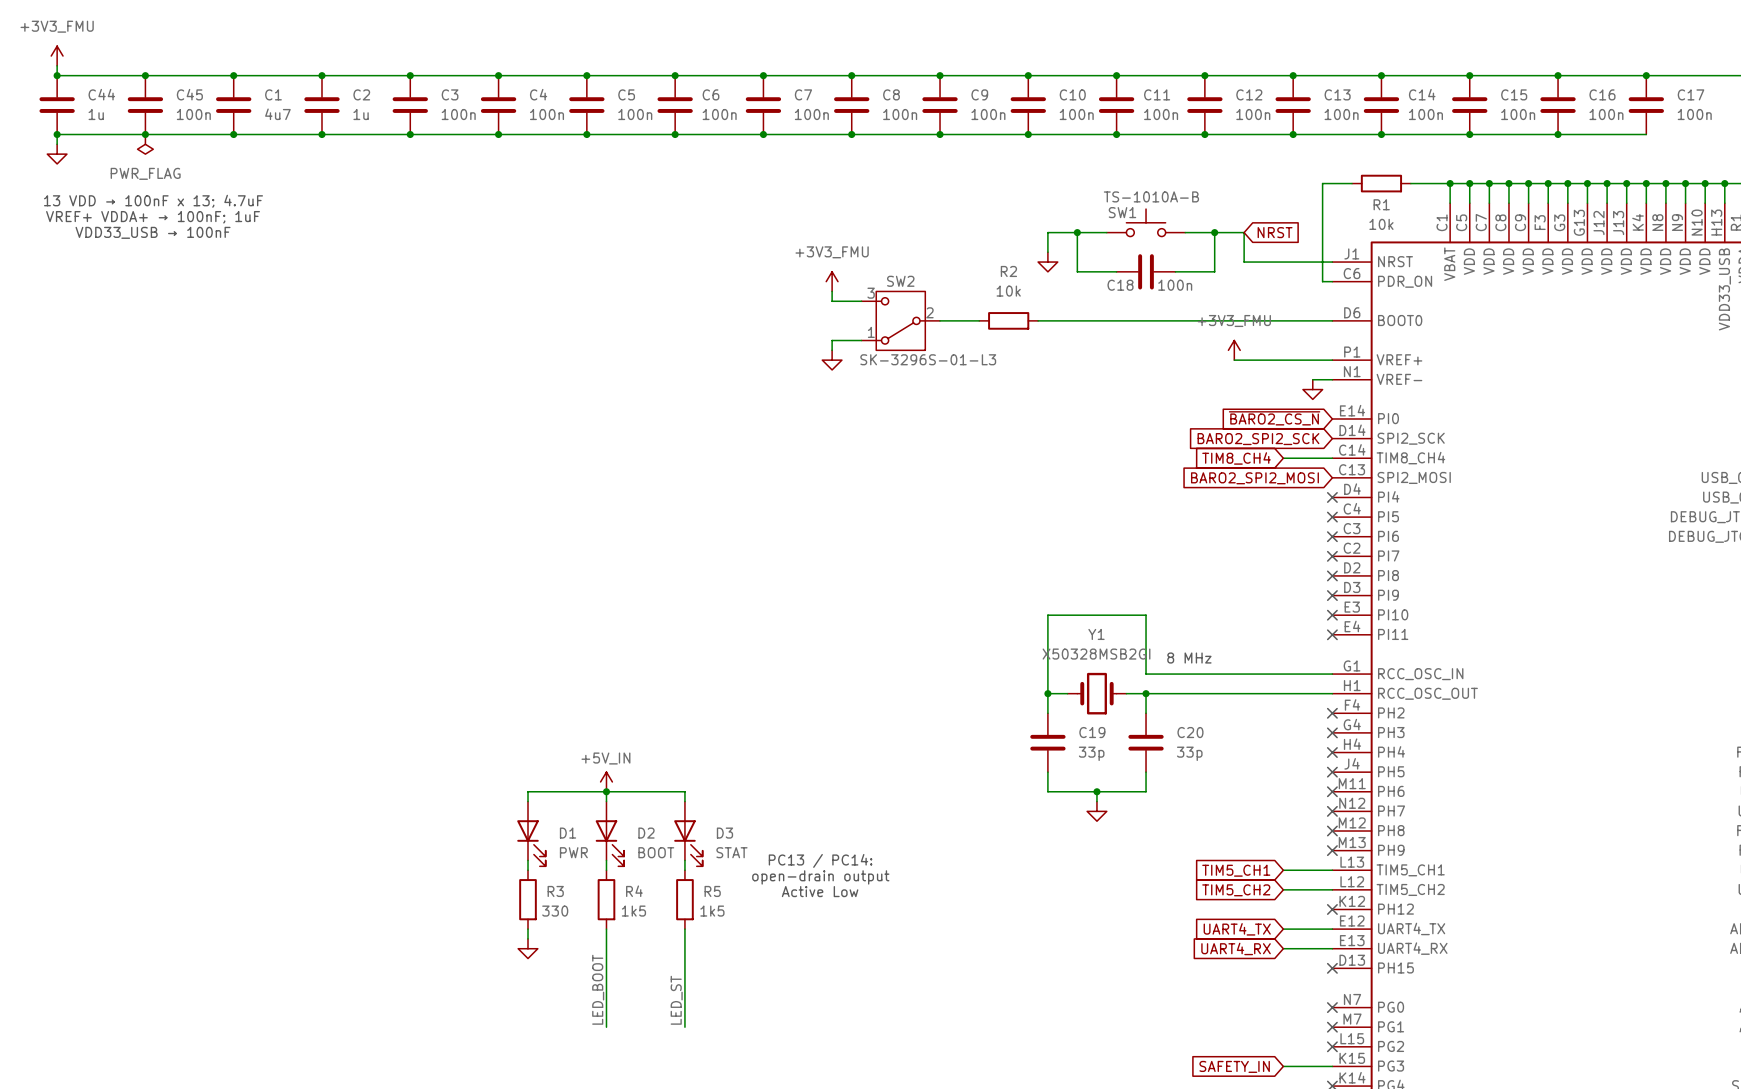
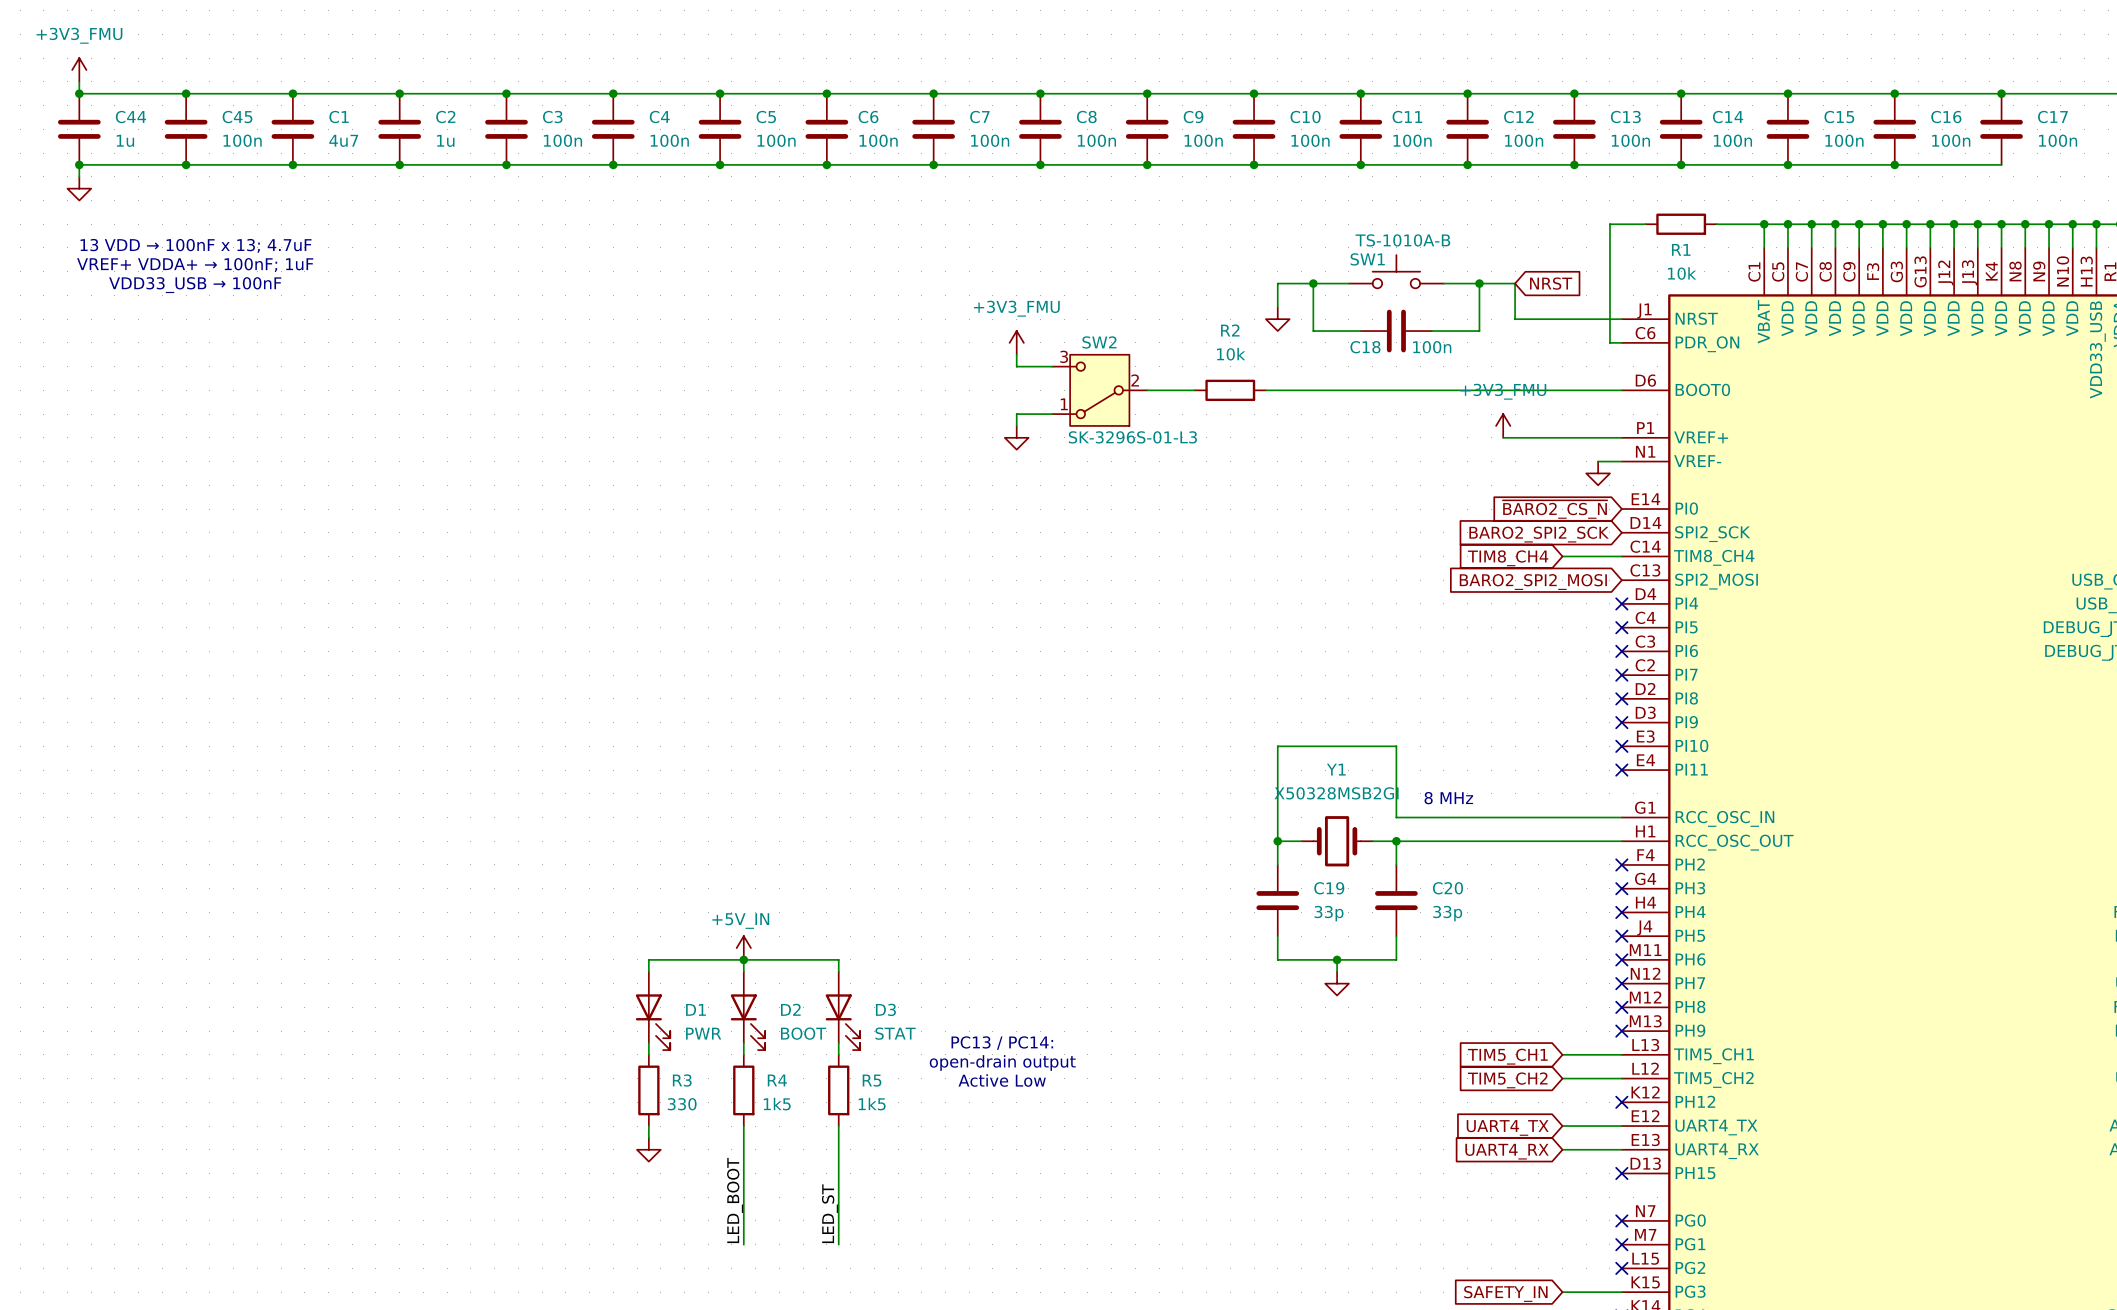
power symbol: PWR_FLAG (145, 144) -> none

